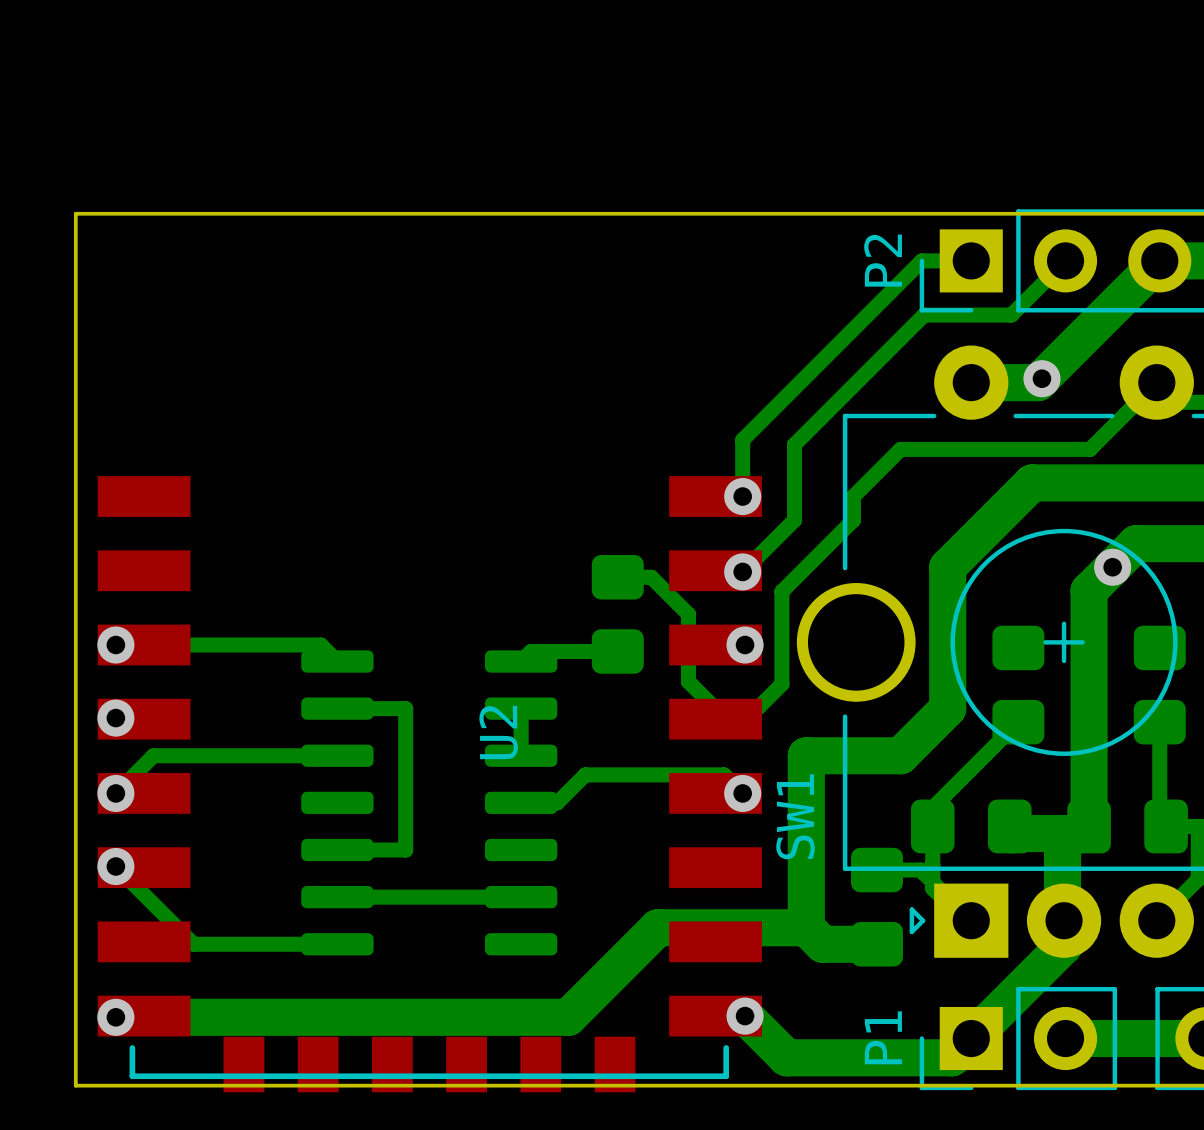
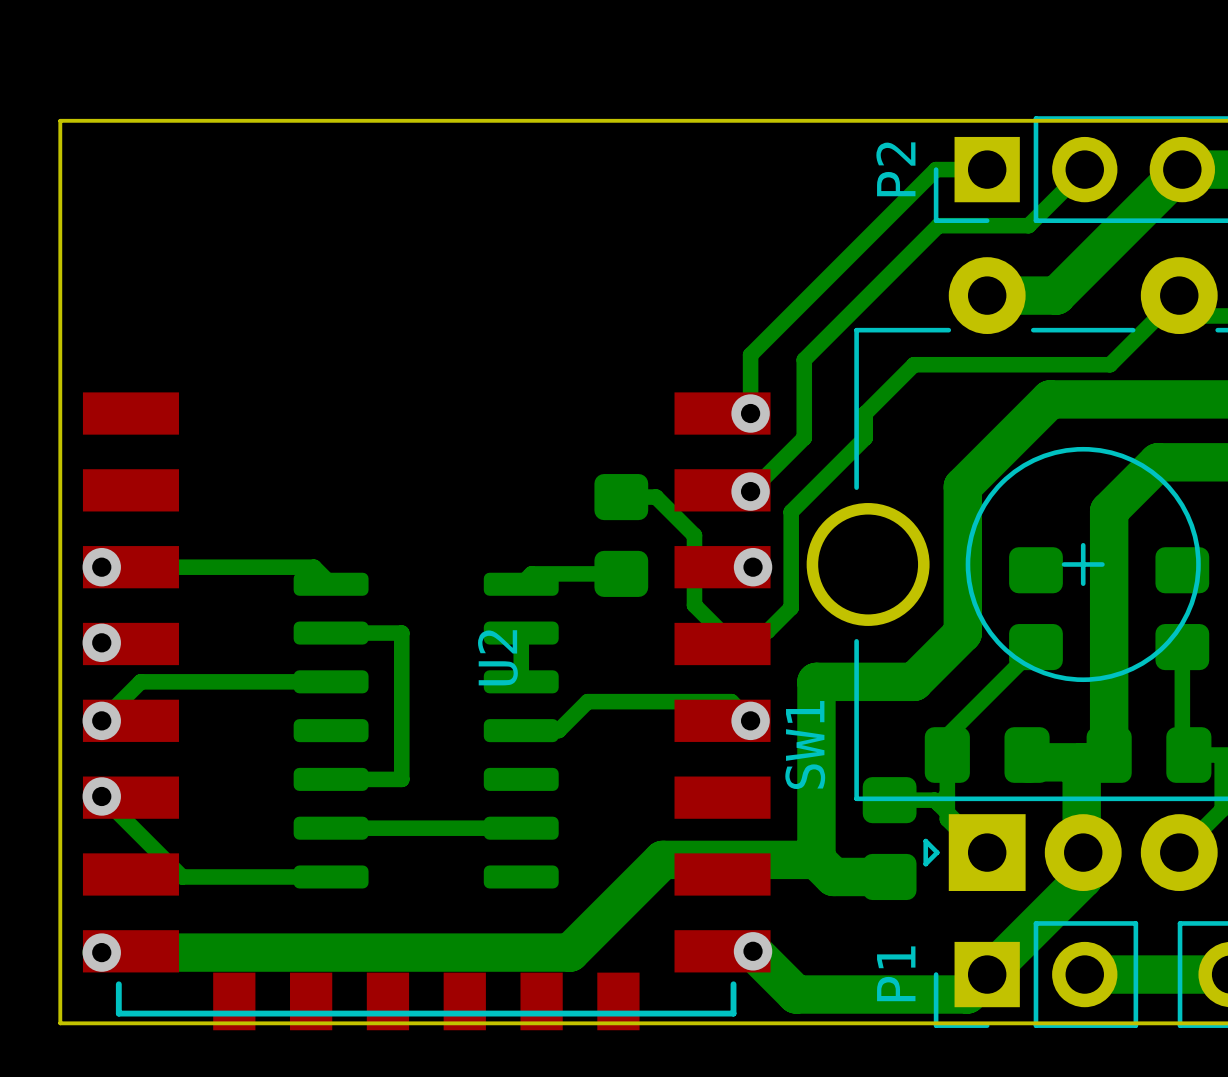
via: (1041, 378) -> none
via: (1112, 567) -> none

